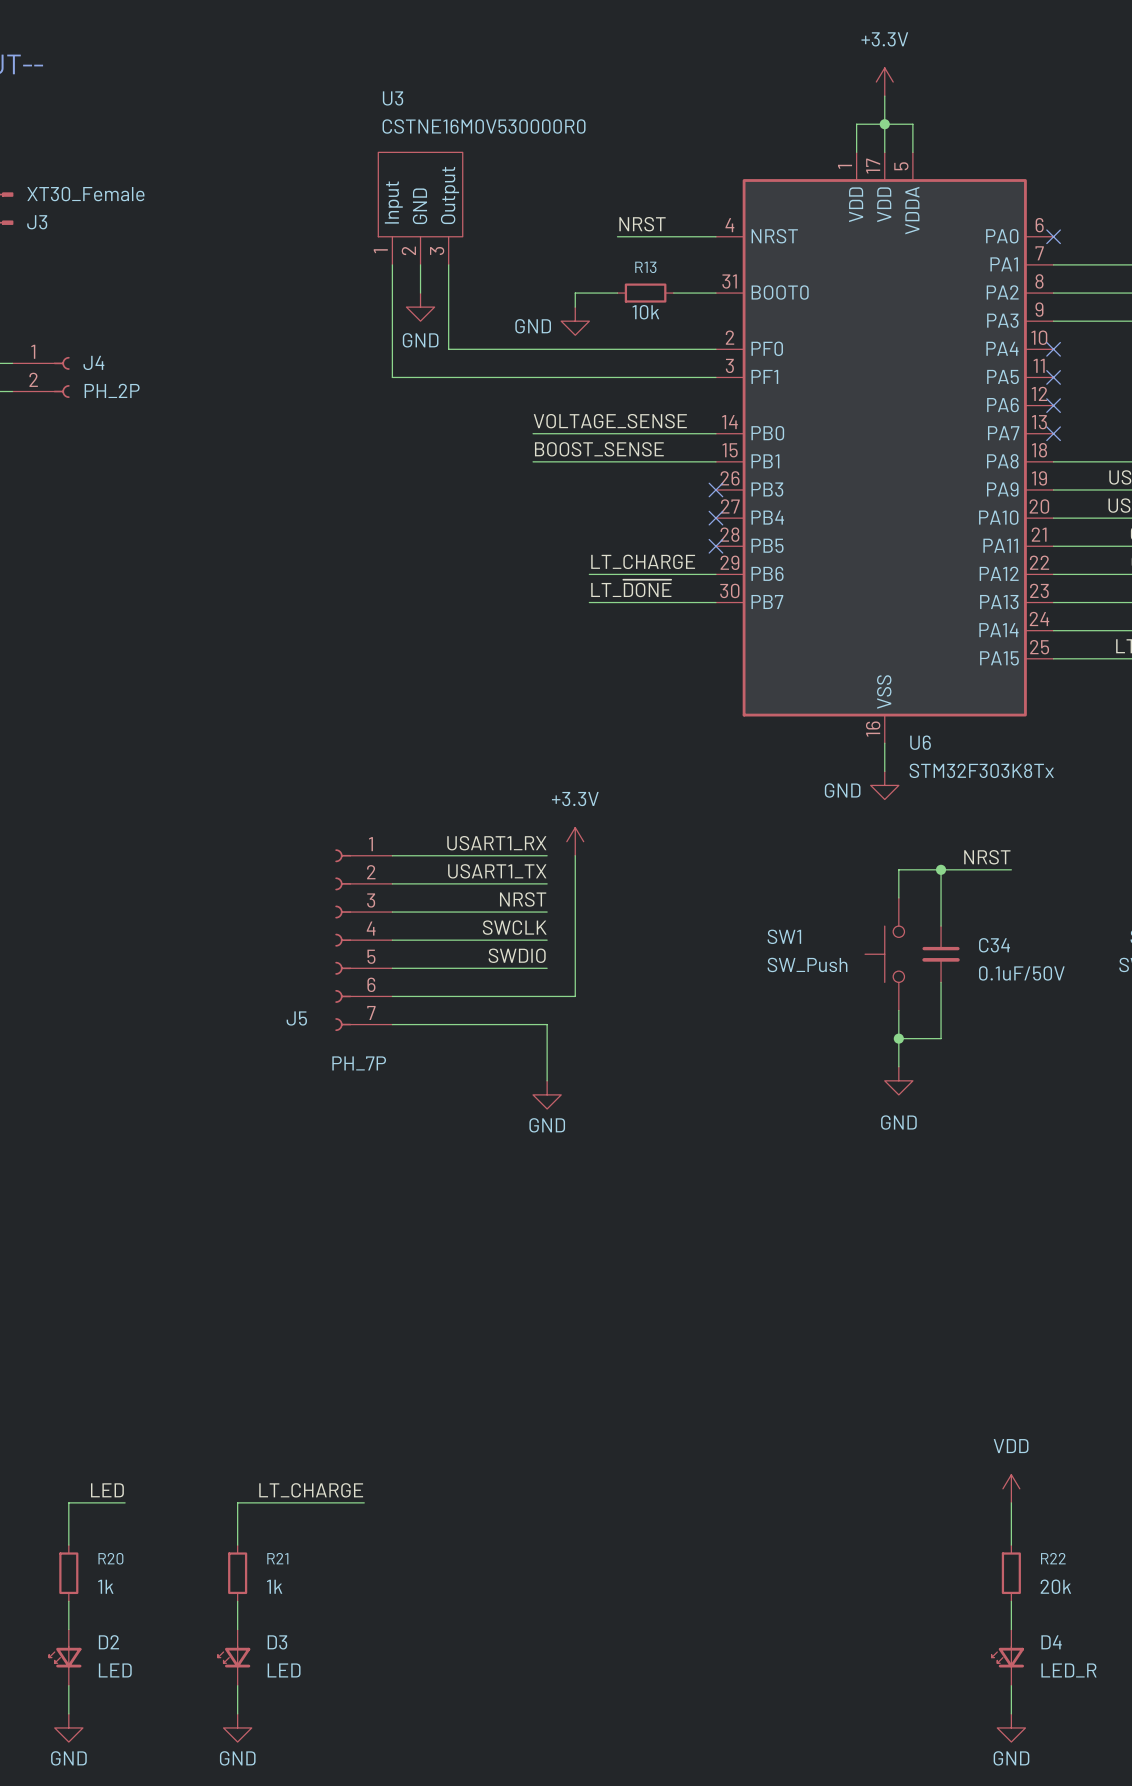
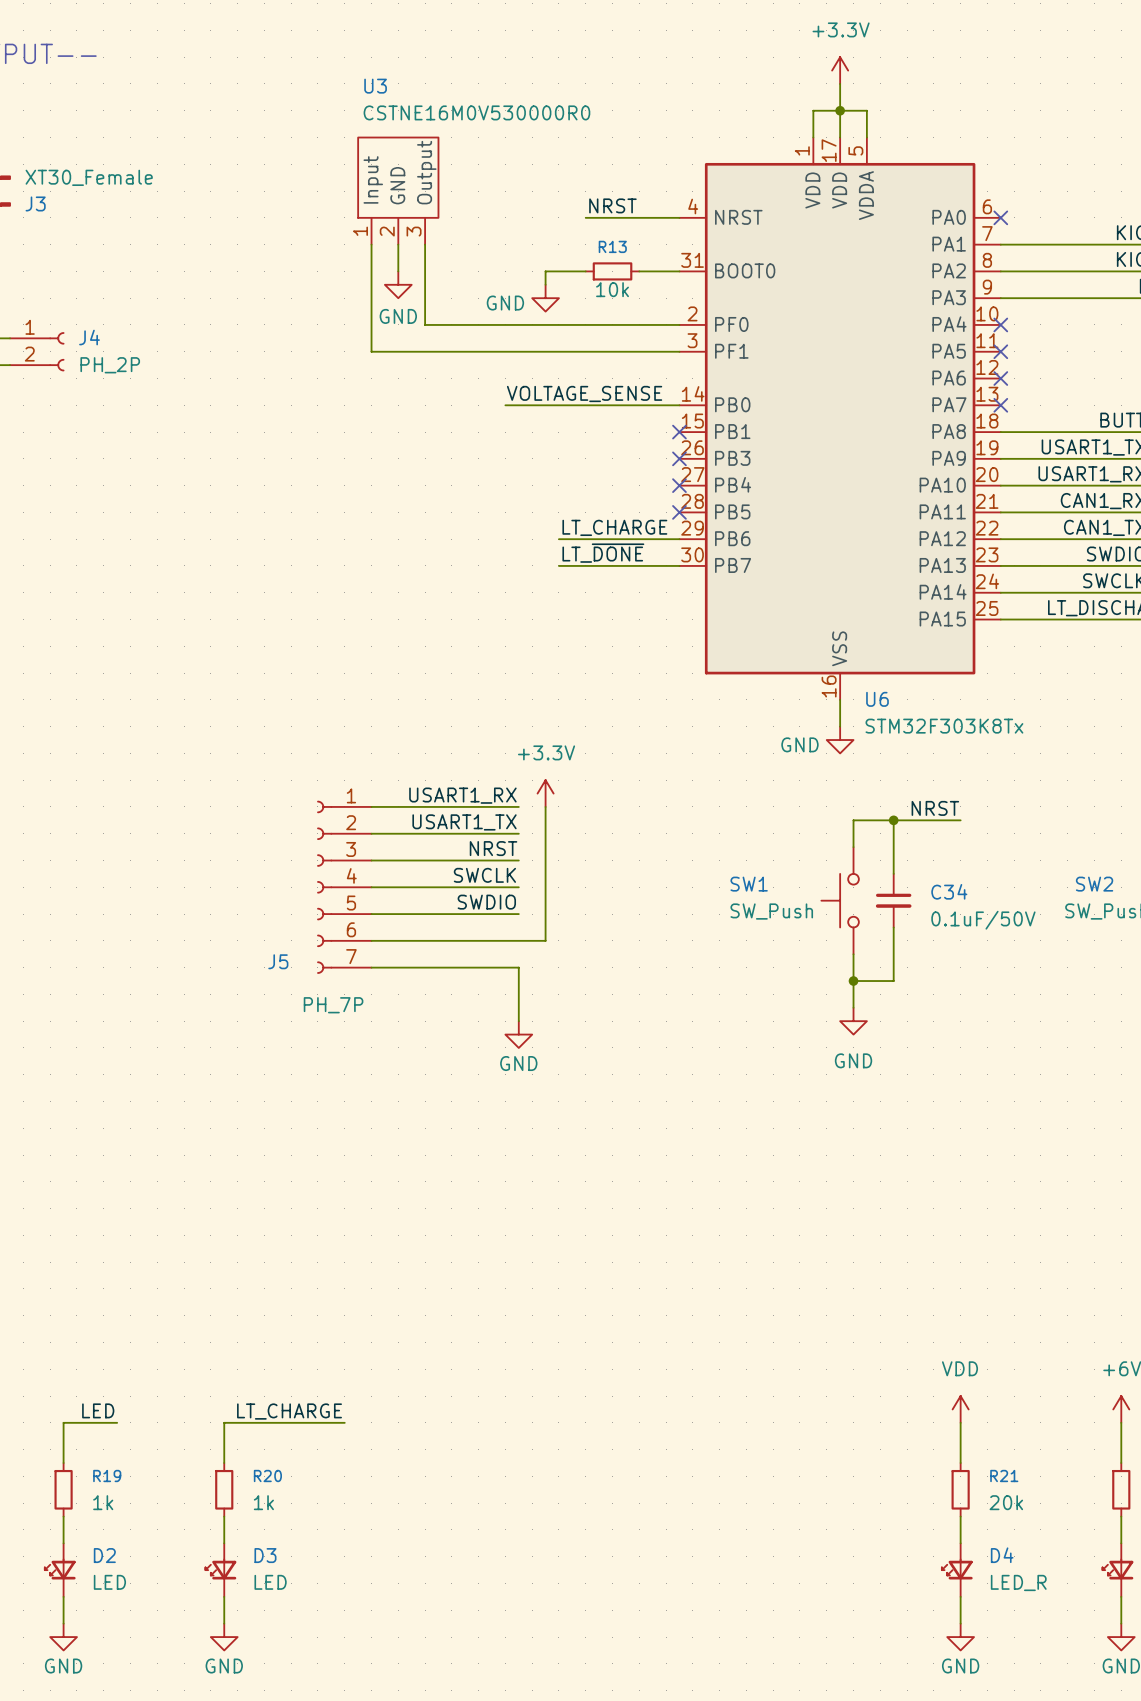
label: BOOST_SENSE (599, 449) -> none
wire: (533, 461) (715, 461) -> none
no-connect mark: none -> (679, 432)
R20 name: R20 (110, 1558) -> R19 (107, 1475)
R21 name: R21 (277, 1558) -> R20 (267, 1475)
R22 name: R22 (1053, 1558) -> R21 (1004, 1475)

